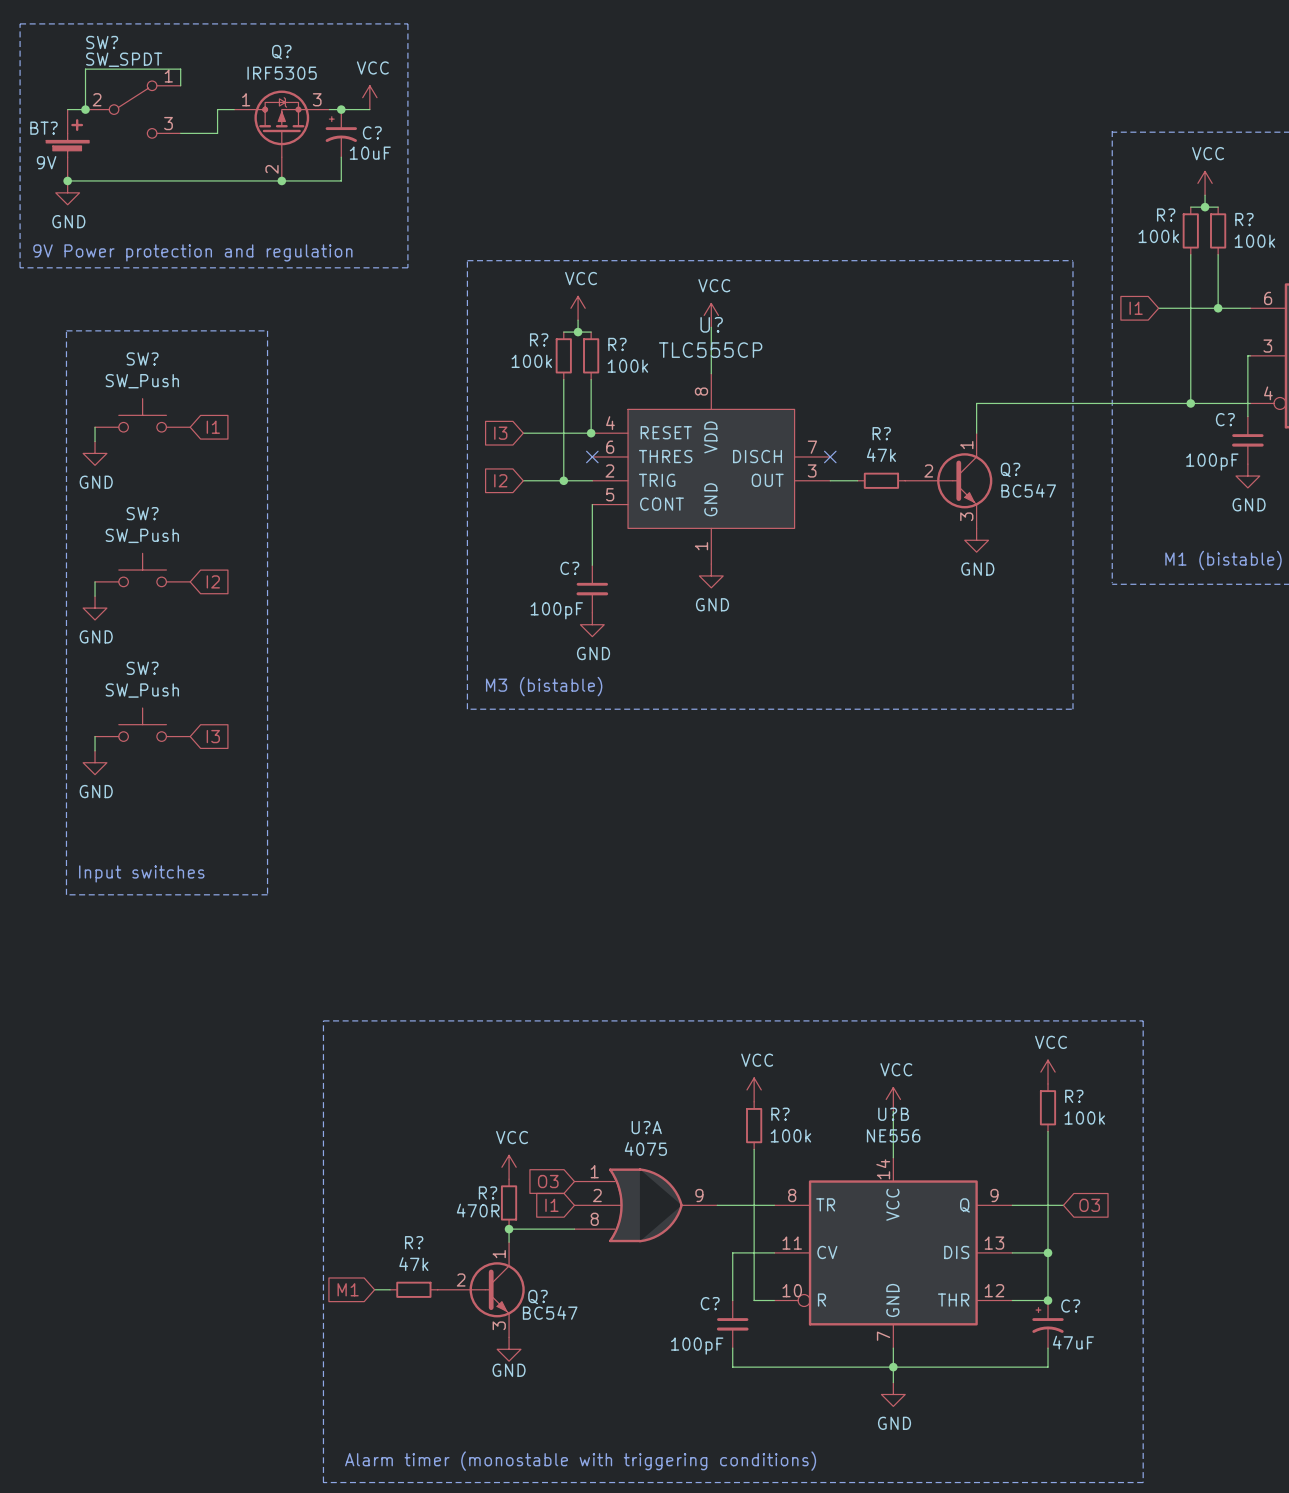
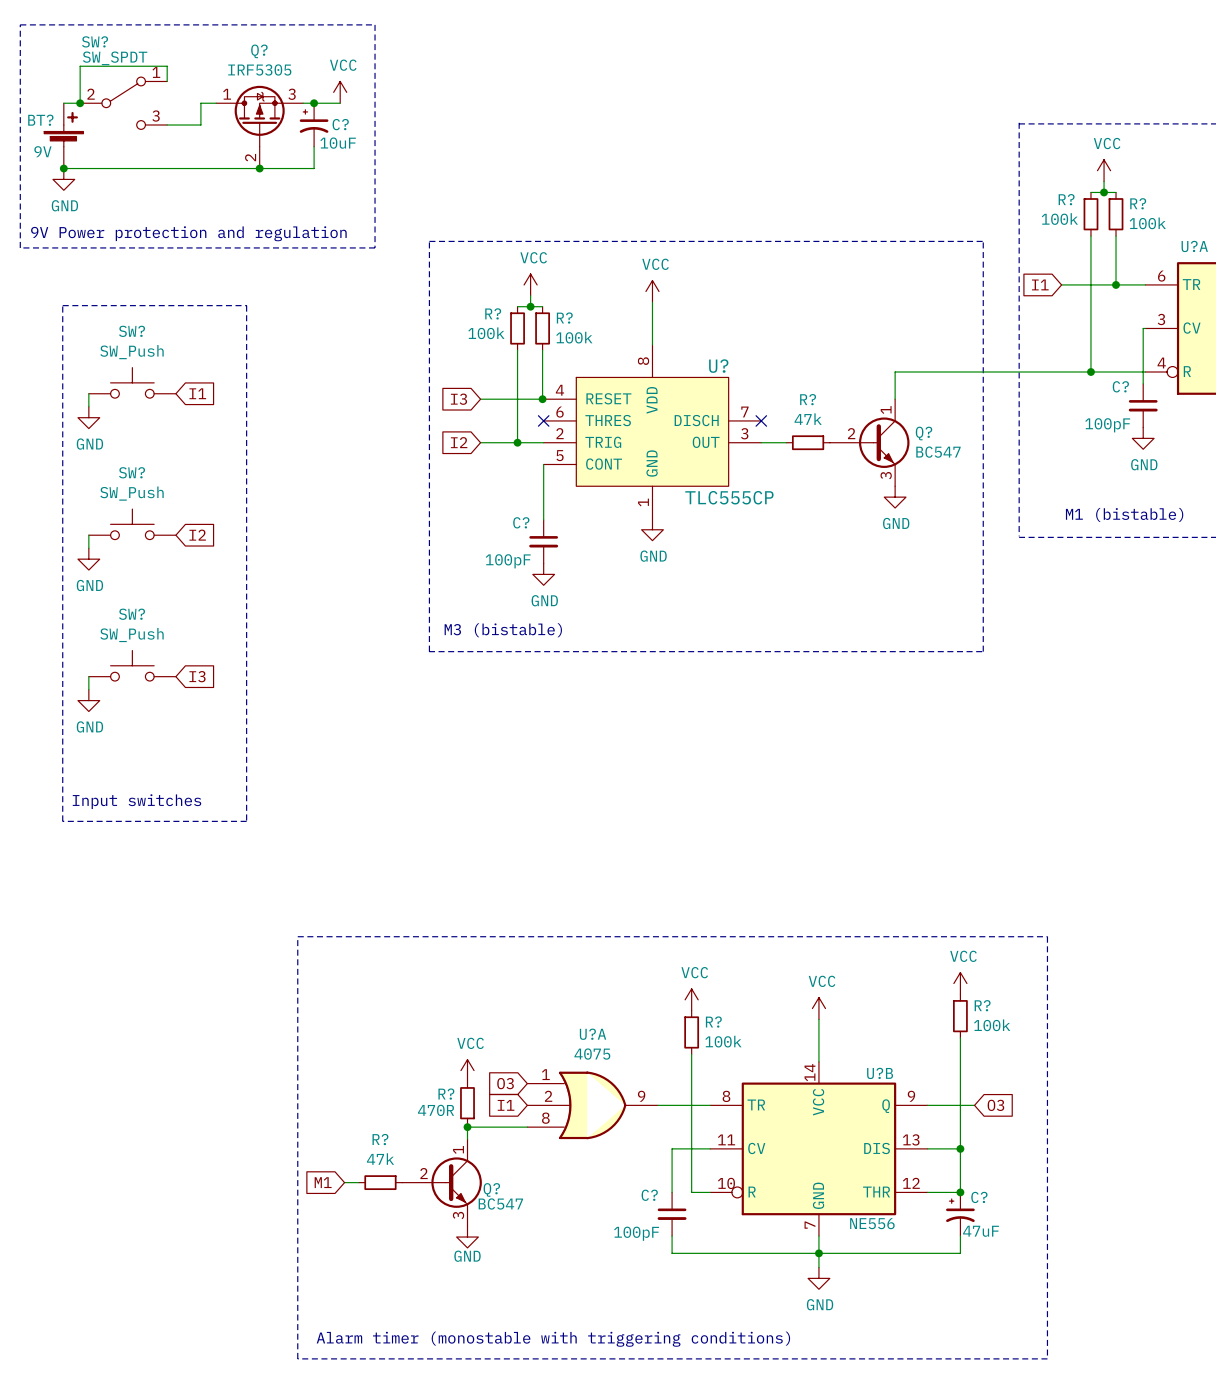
U? name position: U? (711, 324) -> U? (718, 366)
U? value position: TLC555CP (710, 350) -> TLC555CP (729, 497)
U?B name position: U?B (893, 1114) -> U?B (880, 1073)
U?B value position: NE556 (893, 1135) -> NE556 (872, 1223)

